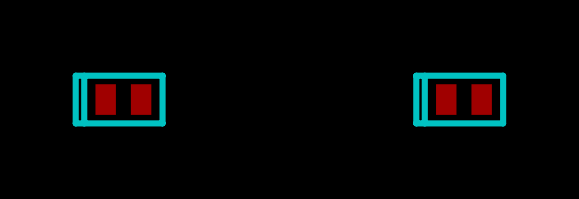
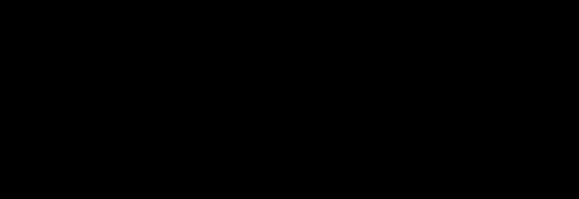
part: (119, 99) -> none
part: (459, 99) -> none

